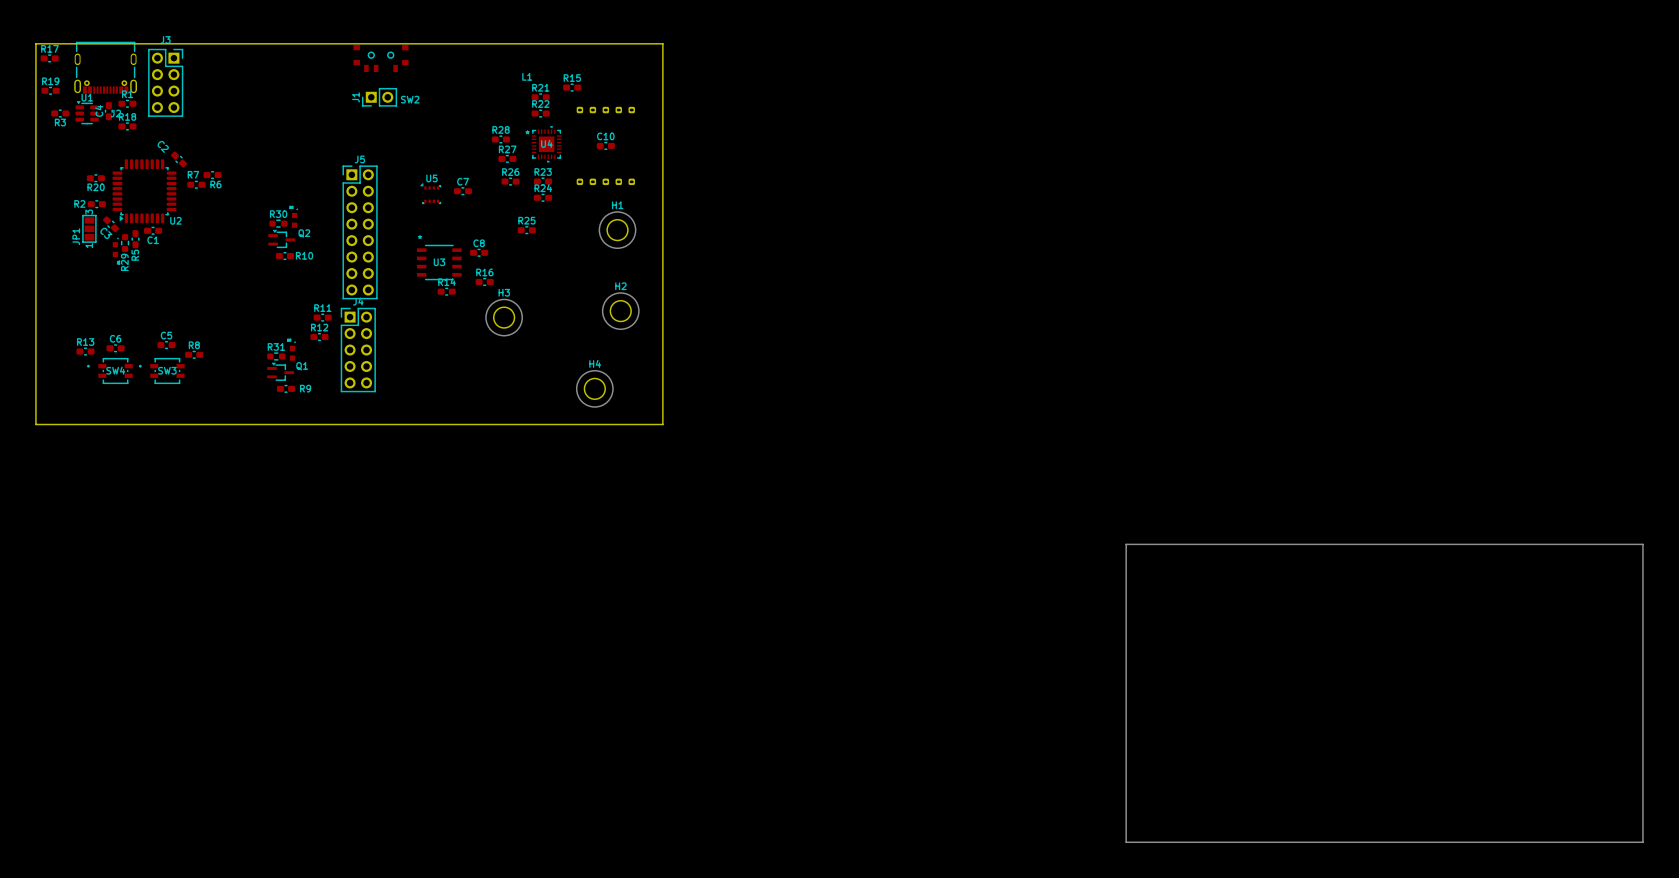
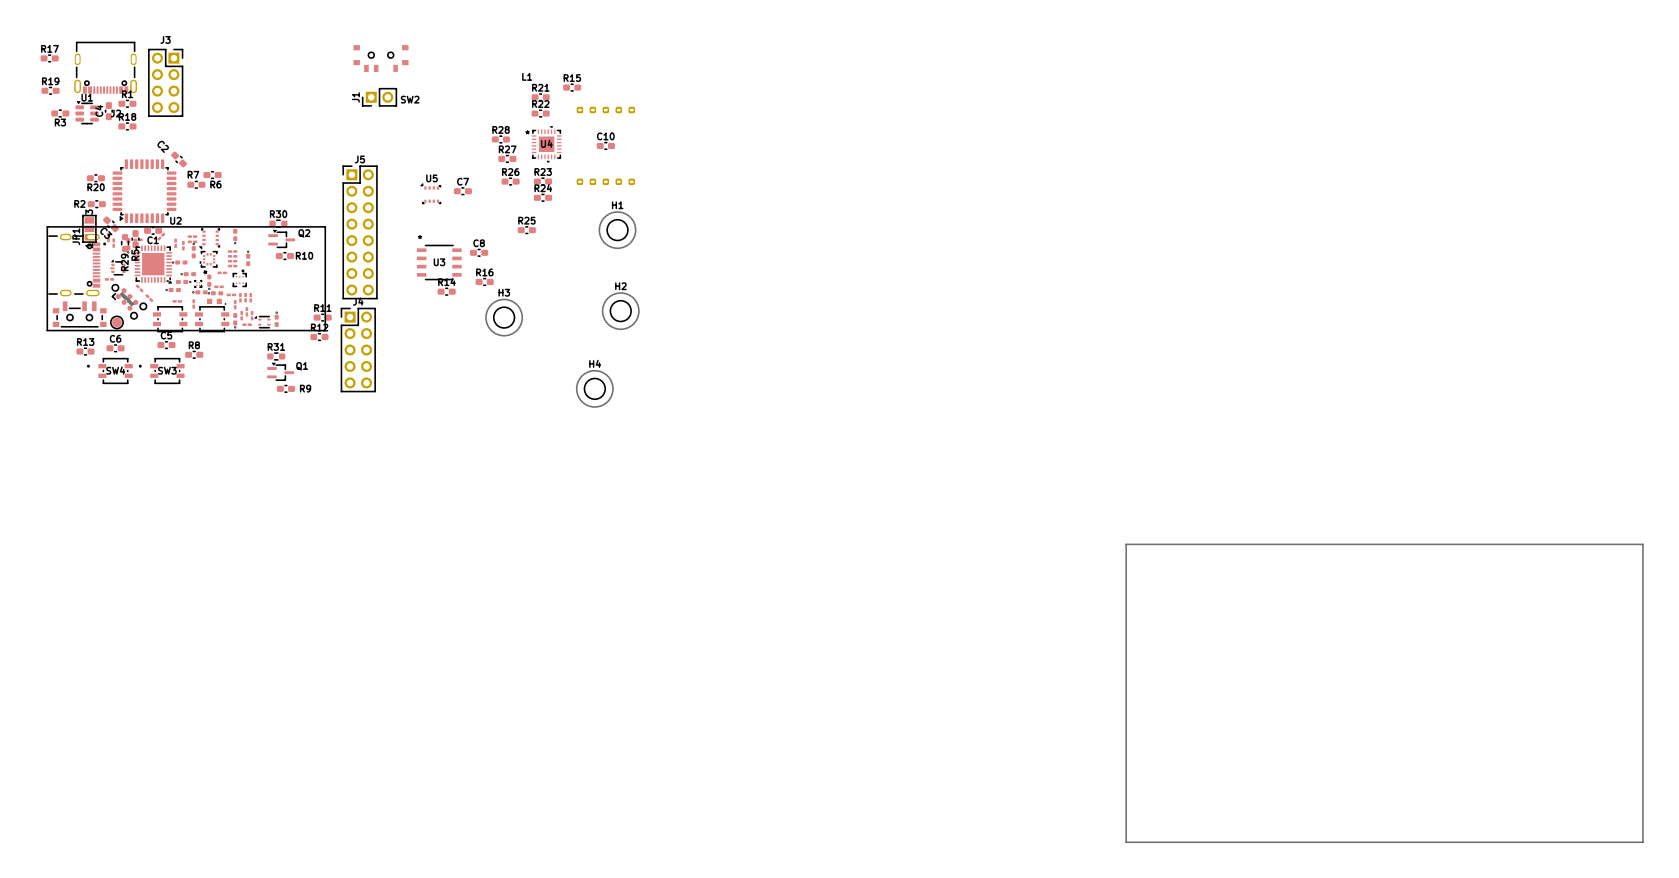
board edge: (35, 43) (662, 43) (662, 424) (35, 424) (35, 43) -> none
part: (295, 218) -> none
board edge: none -> (47, 226) (325, 226) (325, 330) (47, 330) (47, 226)
part: none -> (161, 236)
part: none -> (192, 236)
part: none -> (235, 236)
part: none -> (108, 237)
part: none -> (138, 239)
part: none -> (209, 239)
part: none -> (192, 241)
part: none -> (113, 243)
part: none -> (175, 243)
part: none -> (128, 245)
part: none -> (183, 245)
part: (115, 247) -> none
part: none -> (193, 250)
part: none -> (232, 251)
part: none -> (232, 256)
part: none -> (248, 258)
part: none -> (208, 259)
part: none -> (232, 261)
part: none -> (179, 262)
part: none -> (153, 264)
part: none -> (77, 265)
part: none -> (232, 266)
part: none -> (118, 267)
part: none -> (222, 272)
part: none -> (188, 274)
part: none -> (239, 278)
part: none -> (109, 279)
part: none -> (183, 281)
part: none -> (209, 281)
part: none -> (198, 283)
part: none -> (219, 286)
part: none -> (139, 288)
part: none -> (173, 290)
part: none -> (200, 292)
part: none -> (215, 293)
part: none -> (231, 294)
part: none -> (240, 297)
part: none -> (245, 297)
part: none -> (250, 297)
part: none -> (149, 298)
part: none -> (129, 301)
part: none -> (177, 301)
part: none -> (216, 301)
part: none -> (193, 303)
part: none -> (235, 304)
part: none -> (246, 311)
part: none -> (79, 314)
part: none -> (241, 315)
part: none -> (252, 315)
part: none -> (170, 319)
part: none -> (212, 319)
part: none -> (276, 319)
part: none -> (235, 320)
part: none -> (116, 322)
part: none -> (262, 322)
part: none -> (247, 324)
part: (292, 351) -> none

